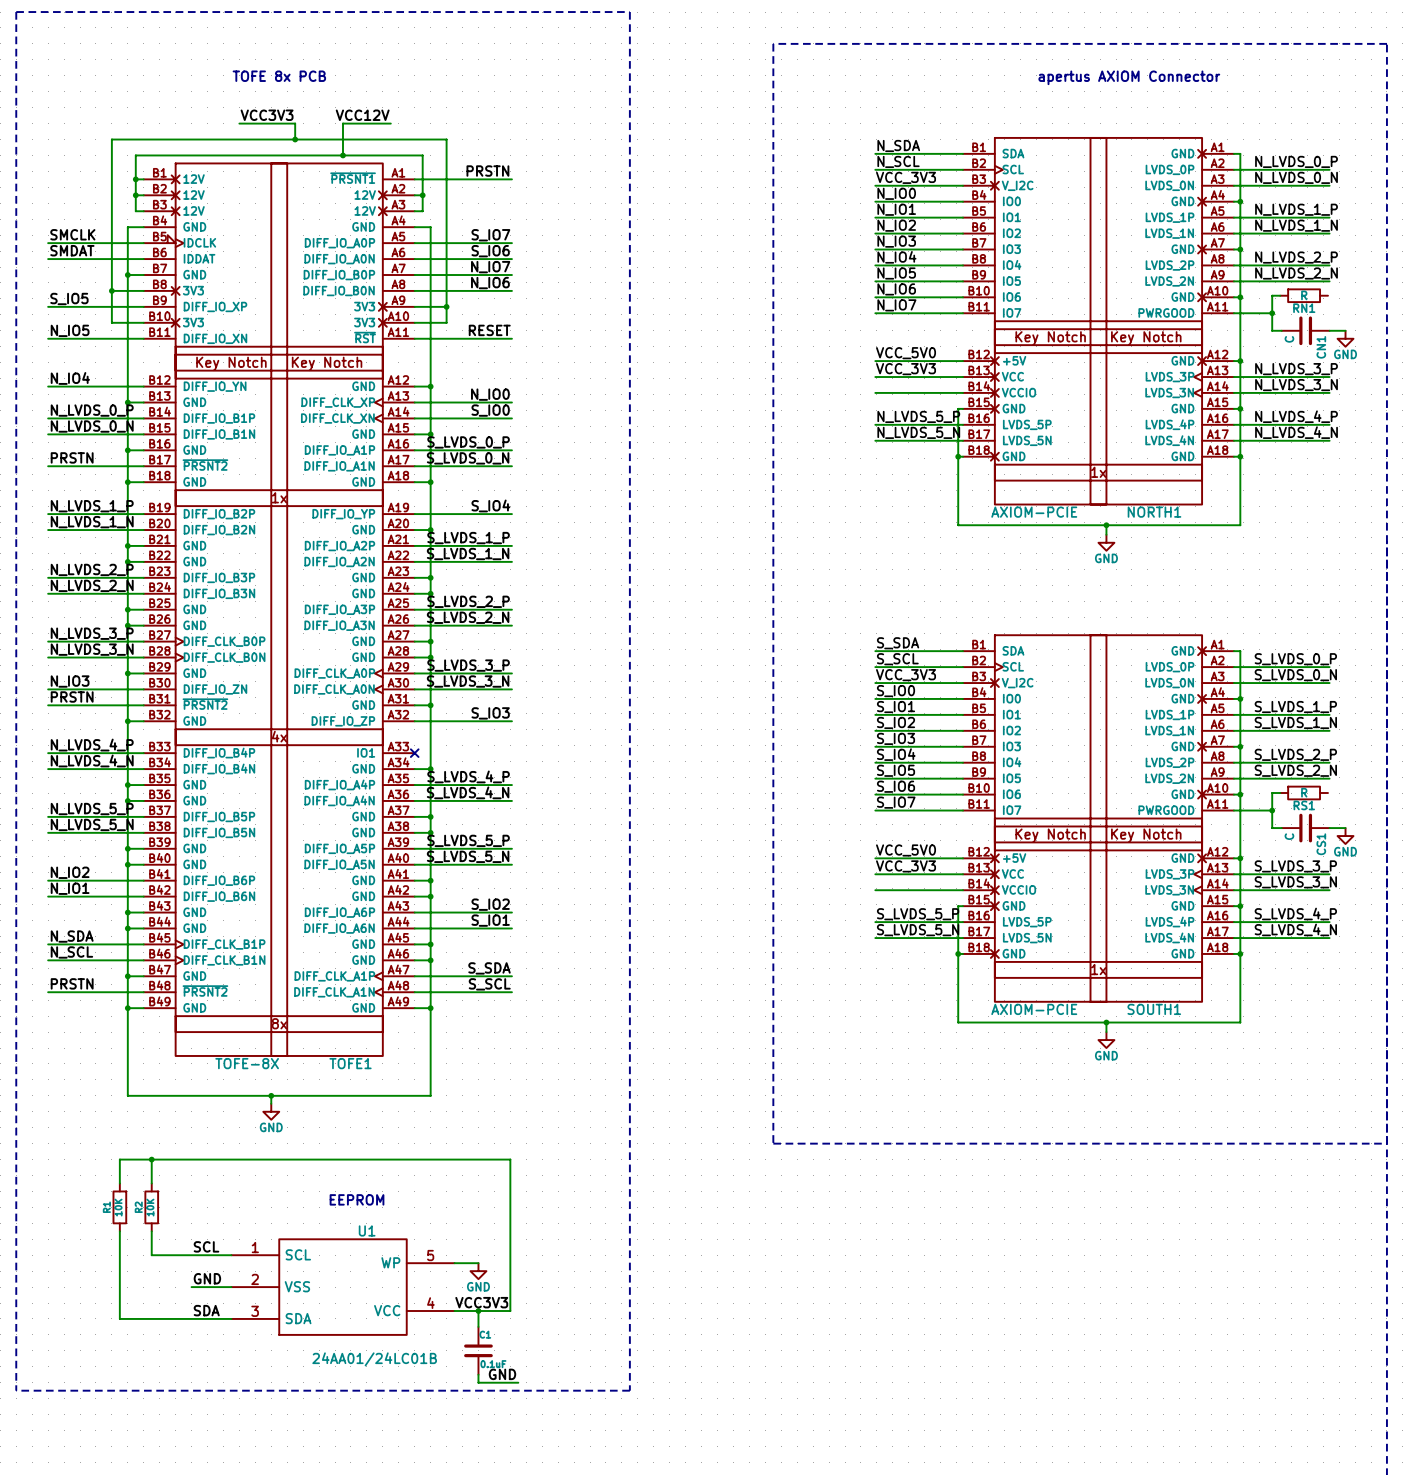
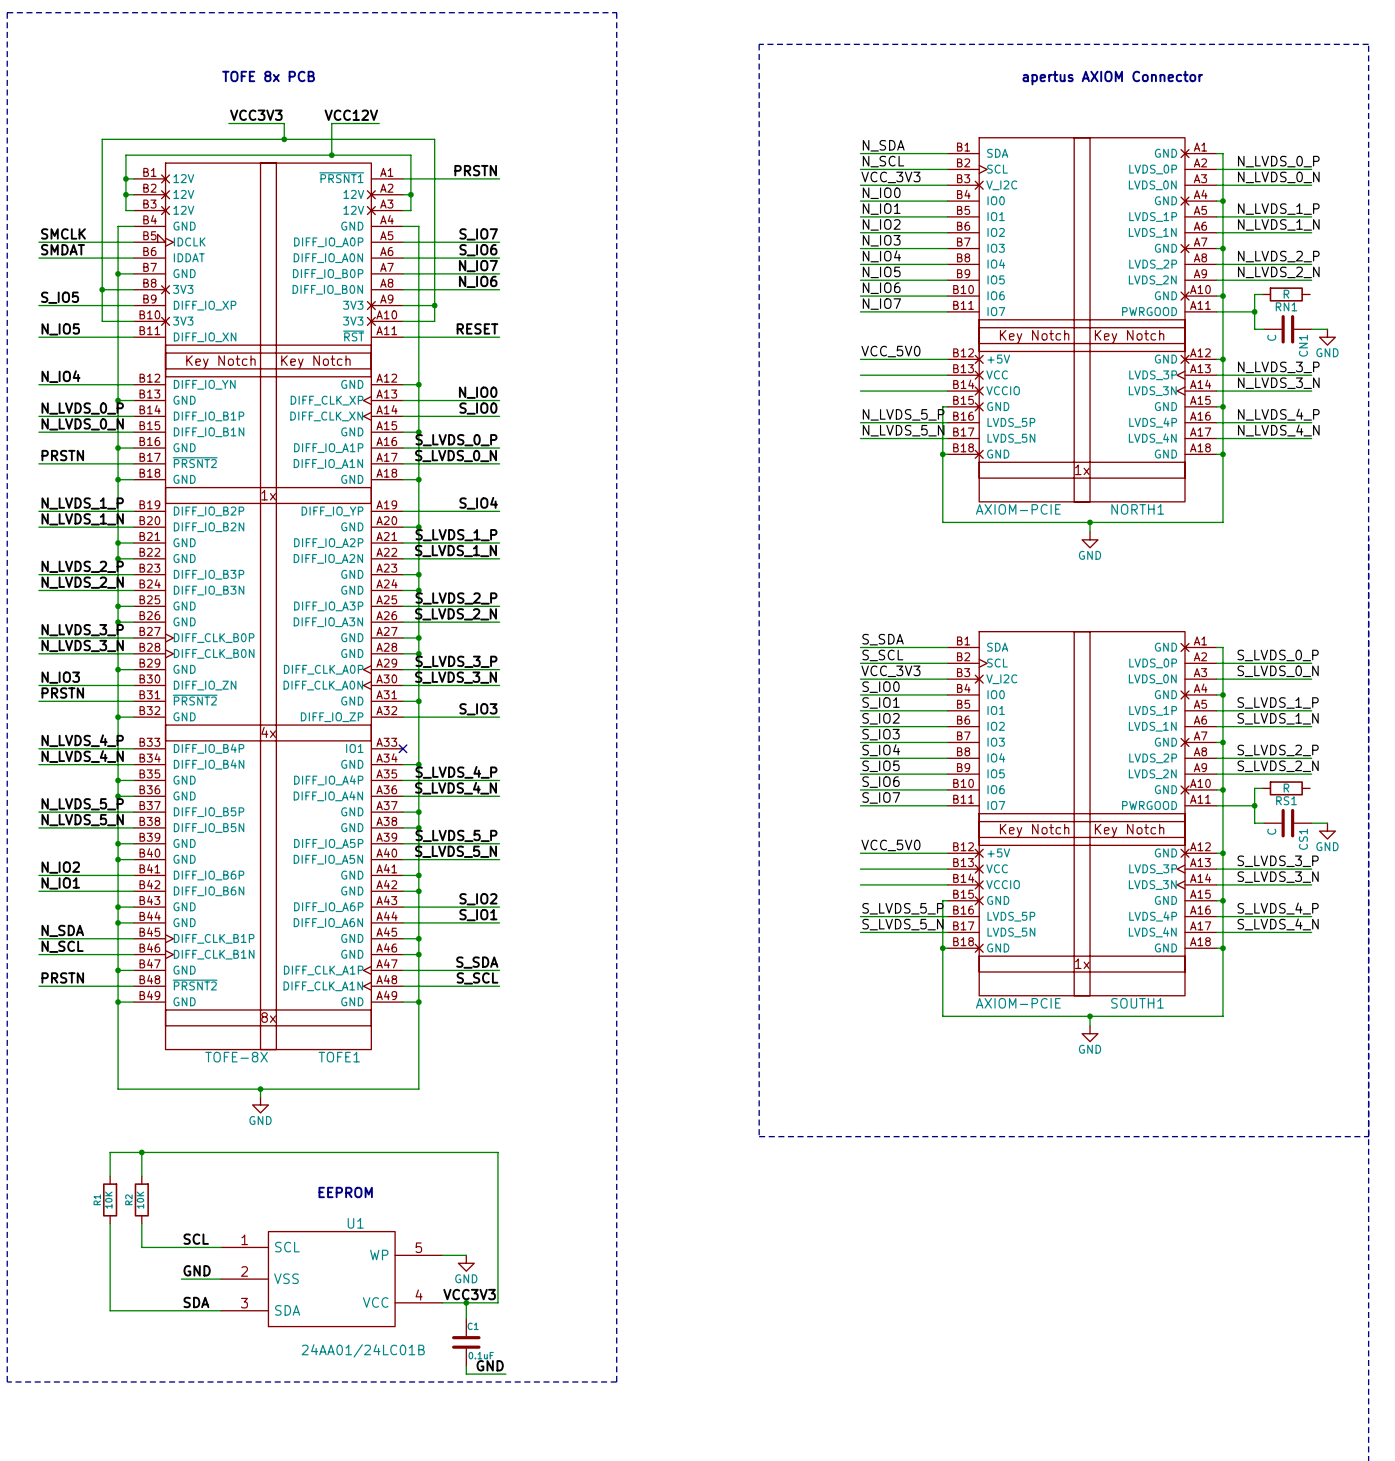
label: VCC_3V3 (906, 369) -> none
label: VCC_3V3 (906, 866) -> none

